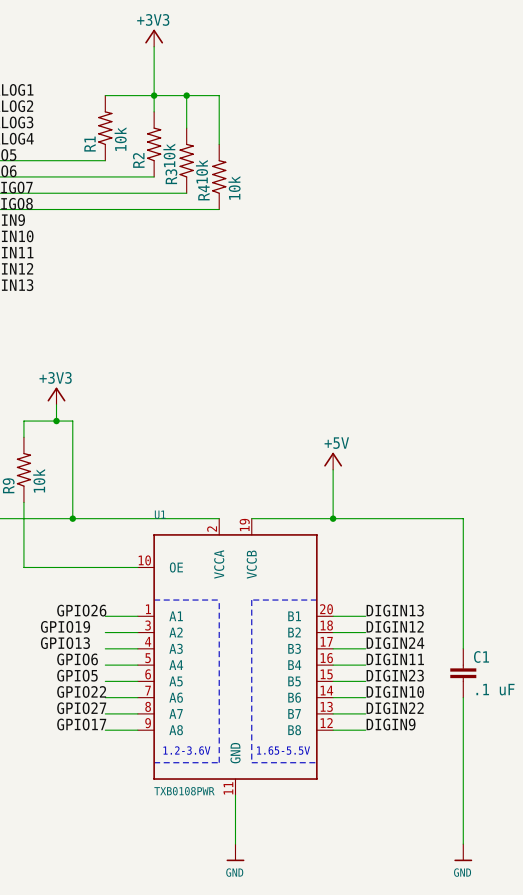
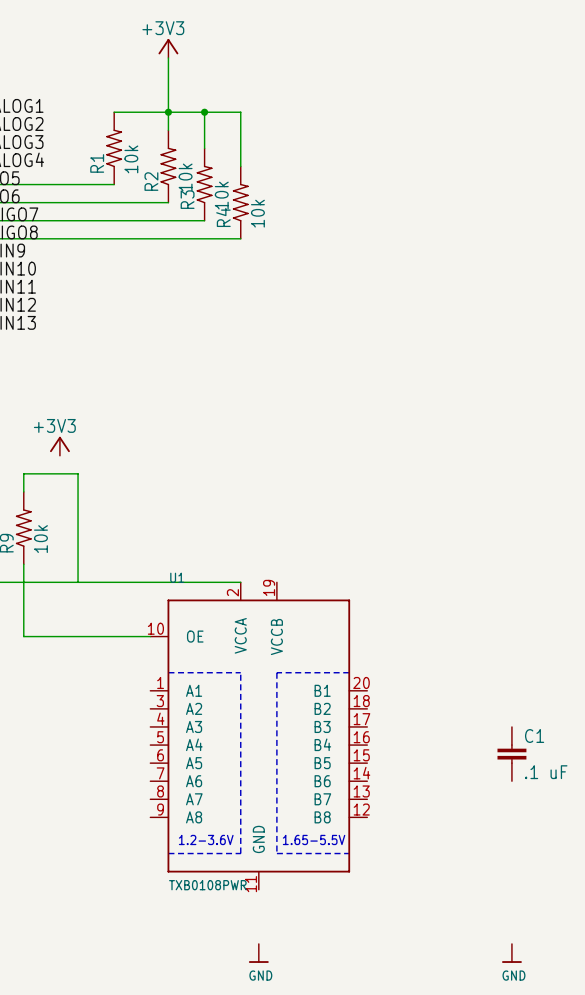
wire: (56, 404) (56, 421) -> none
junction: (56, 421) -> none
power symbol: +5V (333, 461) -> none
wire: (333, 469) (333, 518) -> none
junction: (72, 518) -> none
wire: (251, 518) (463, 518) (463, 648) -> none
junction: (333, 518) -> none
label: GPIO26 (81, 610) -> none
label: DIGIN13 (395, 610) -> none
wire: (105, 616) (137, 616) -> none
wire: (333, 616) (365, 616) -> none
label: GPIO19 (65, 626) -> none
label: DIGIN12 (395, 626) -> none
wire: (105, 632) (137, 632) -> none
wire: (333, 632) (365, 632) -> none
label: GPIO13 (65, 643) -> none
label: DIGIN24 (395, 643) -> none
wire: (105, 648) (137, 648) -> none
wire: (333, 648) (365, 648) -> none
label: GPIO6 (77, 659) -> none
label: DIGIN11 (395, 659) -> none
wire: (105, 665) (137, 665) -> none
wire: (333, 665) (365, 665) -> none
label: GPIO5 (77, 675) -> none
label: DIGIN23 (395, 675) -> none
wire: (105, 681) (137, 681) -> none
wire: (333, 681) (365, 681) -> none
label: GPIO22 (81, 691) -> none
label: DIGIN10 (395, 691) -> none
wire: (105, 697) (137, 697) -> none
wire: (333, 697) (365, 697) -> none
wire: (463, 697) (463, 844) -> none
label: GPIO27 (81, 708) -> none
label: DIGIN22 (395, 708) -> none
wire: (105, 713) (137, 713) -> none
wire: (333, 713) (365, 713) -> none
label: GPIO17 (81, 724) -> none
label: DIGIN9 (391, 724) -> none
wire: (105, 730) (137, 730) -> none
wire: (333, 730) (365, 730) -> none
wire: (235, 795) (235, 844) -> none

